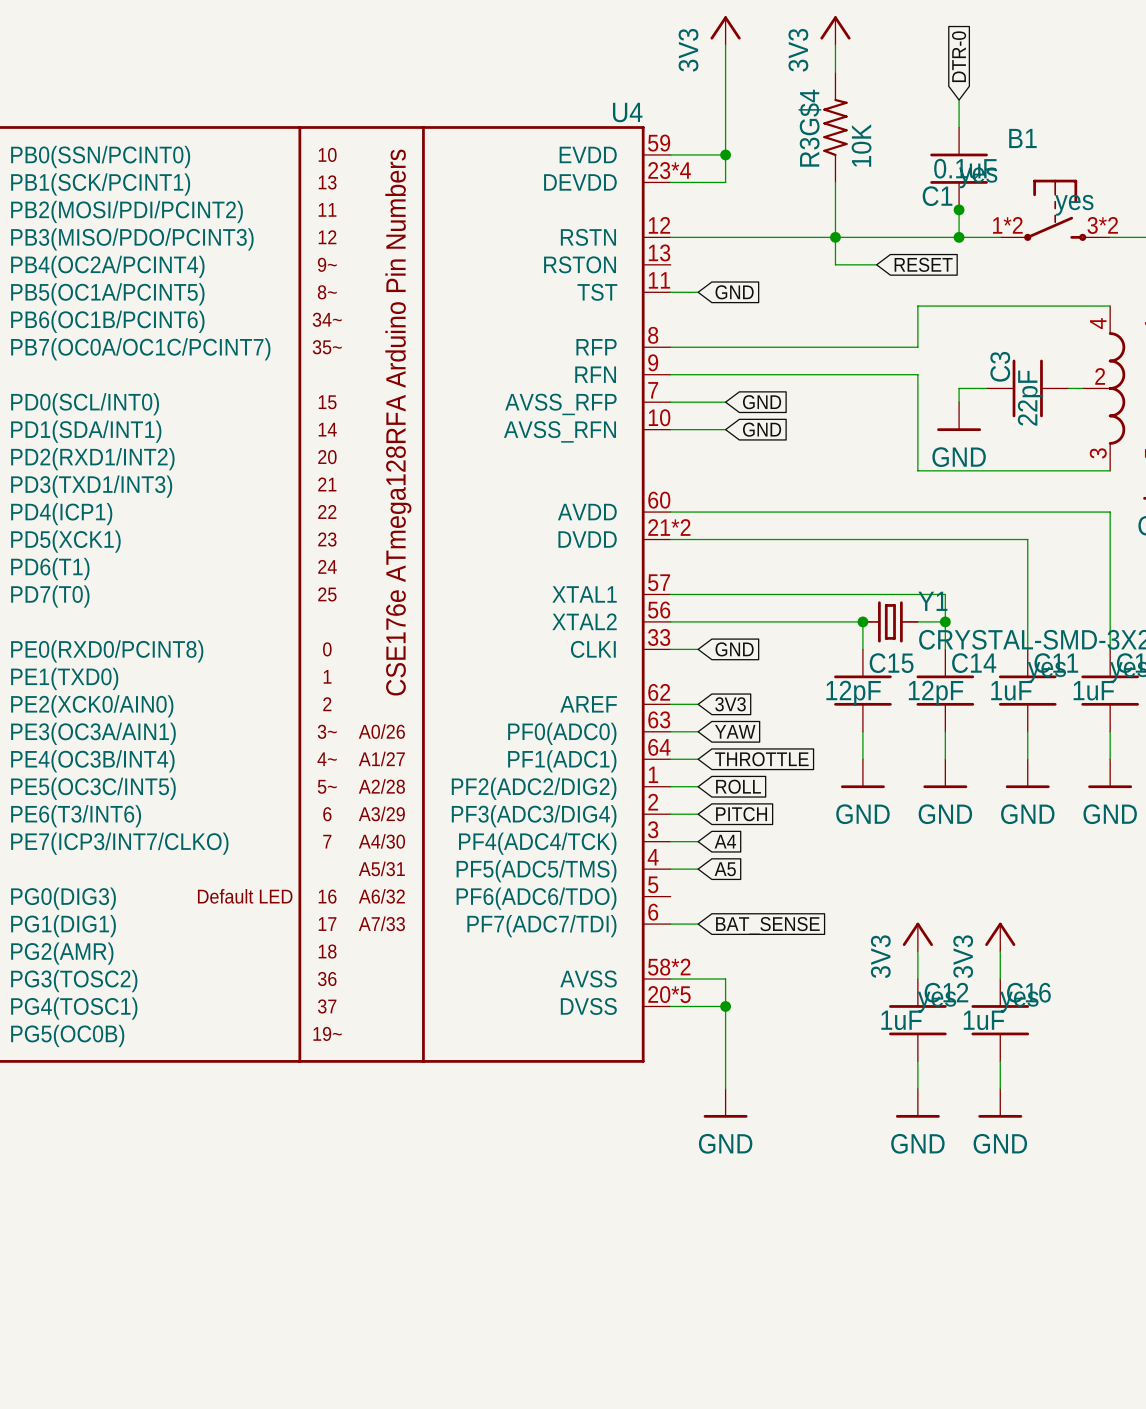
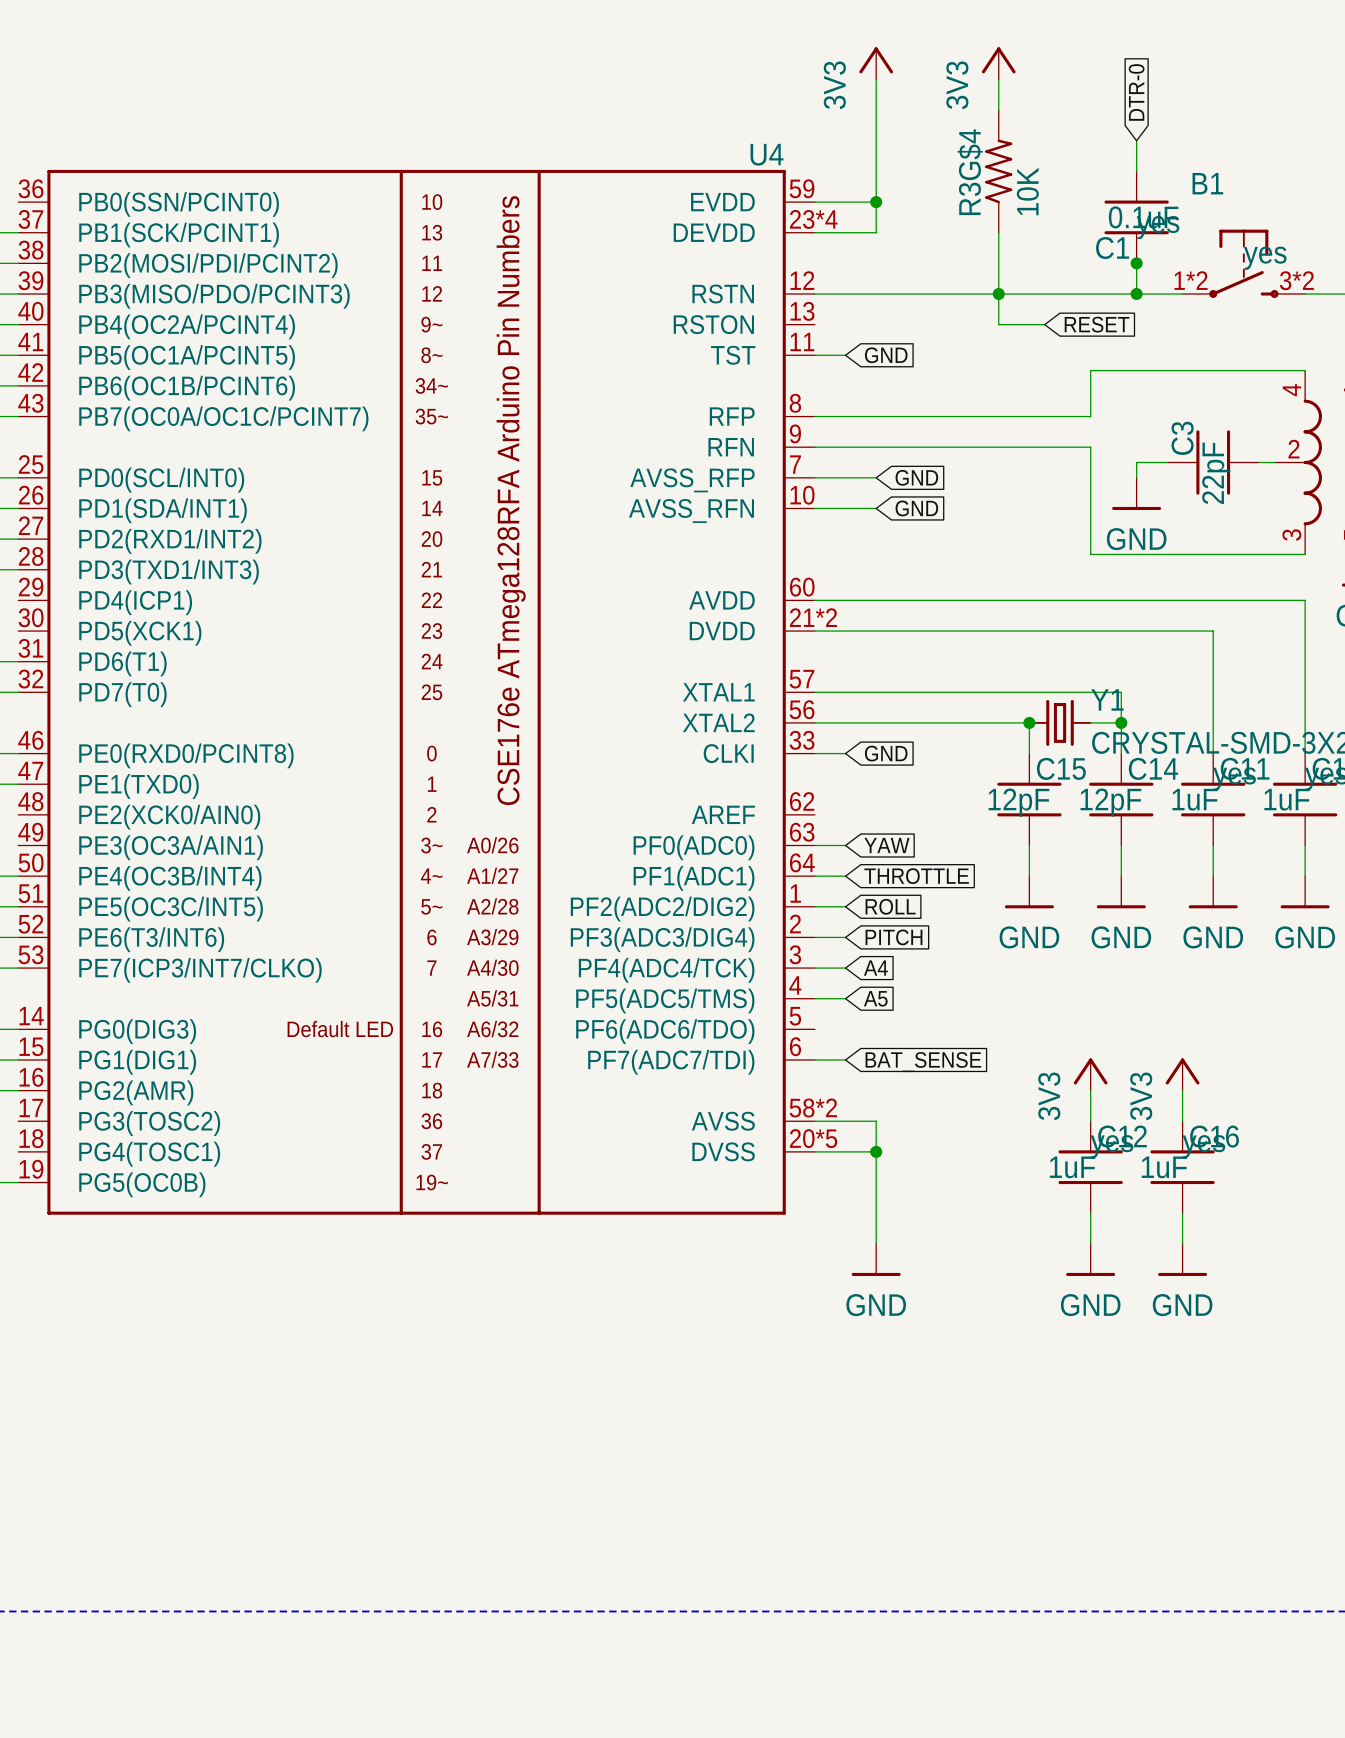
wire: (670, 704) (698, 704) -> none
global label: 3V3 (730, 704) -> none

